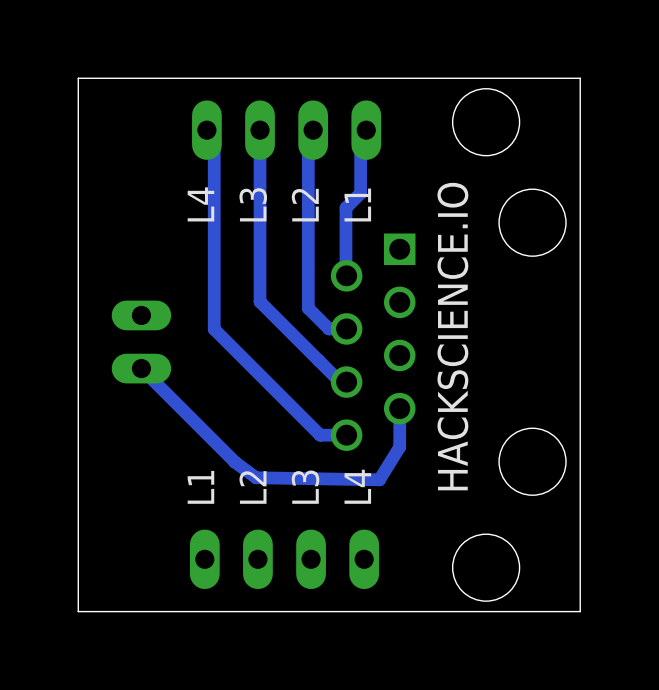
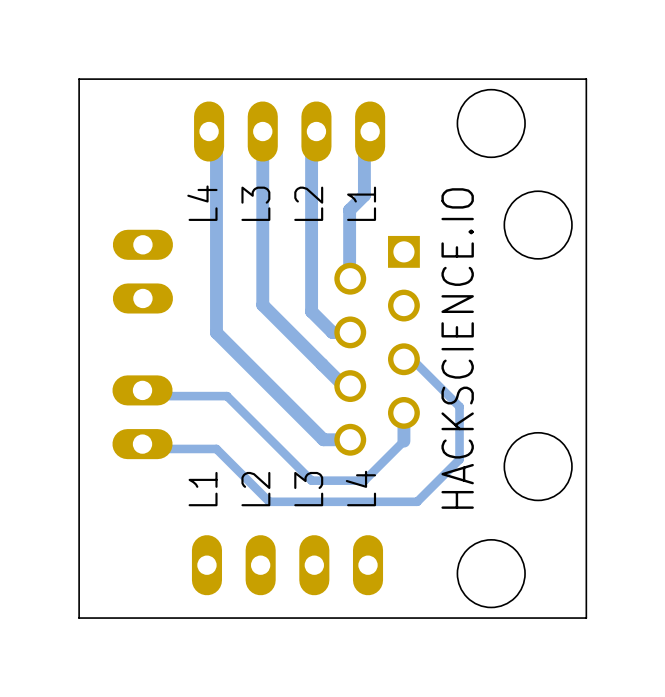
part: none -> (142, 271)
part: (141, 342) -> none
track: none -> (403, 359) (412, 359) (459, 406) (459, 459) (417, 501) (269, 501) (216, 448) (147, 448) (142, 444)
track: (141, 368) (235, 462) (256, 477) (379, 479) (399, 447) (399, 436) -> (142, 390) (148, 396) (227, 396) (311, 480) (364, 480) (403, 441)
part: none -> (142, 417)

